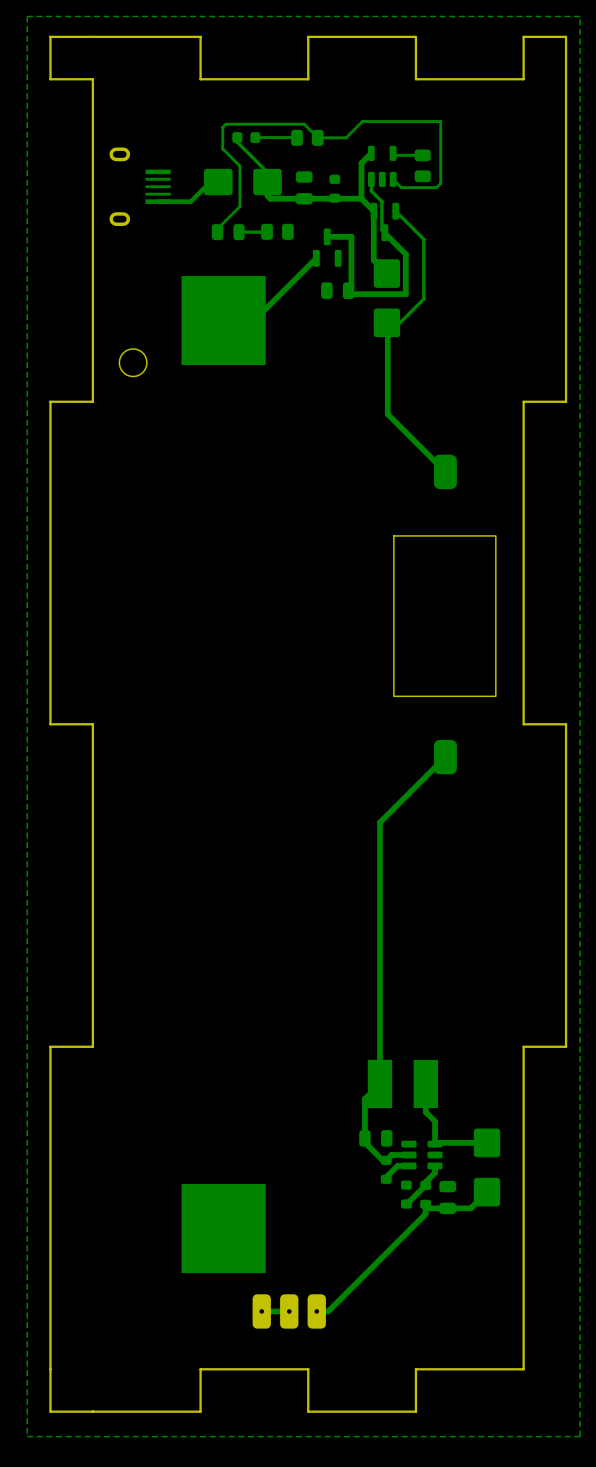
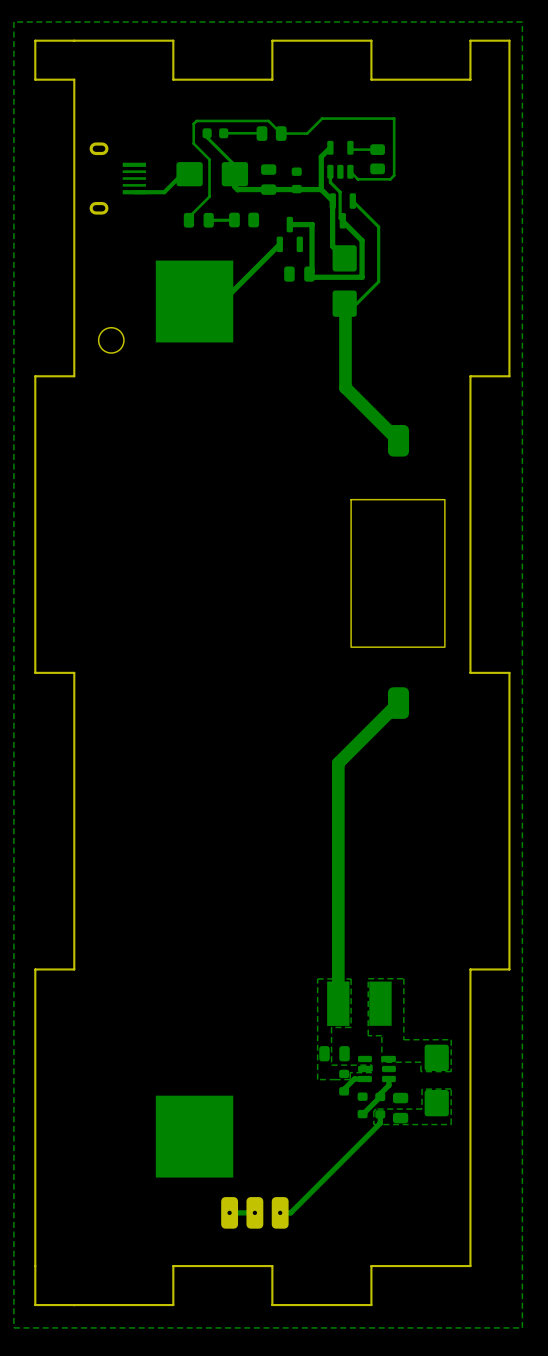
bottom track width: thin (387, 330) (387, 414) (445, 471) -> thick (345, 310) (345, 387) (398, 440)
bottom track width: thin (445, 757) (379, 822) (379, 1083) -> thick (398, 703) (338, 763) (338, 1003)
bottom zone outline: none -> (368, 978) (403, 978) (403, 1039) (451, 1039) (451, 1071) (420, 1071) (420, 1062) (381, 1062) (381, 1035) (368, 1035) (368, 978)
bottom zone outline: none -> (317, 978) (317, 1079) (350, 1079) (350, 1072) (371, 1072) (371, 1065) (331, 1065) (331, 1027) (351, 1027) (351, 978) (317, 978)
bottom track: (379, 1083) (364, 1099) (364, 1142) (382, 1160) (386, 1160) (391, 1155) (408, 1155) -> none
bottom track: (425, 1090) (425, 1112) (435, 1121) (435, 1144) (486, 1142) -> none
bottom zone outline: none -> (451, 1088) (451, 1124) (373, 1124) (373, 1111) (375, 1109) (422, 1109) (422, 1089) (451, 1088)
bottom track: (486, 1192) (470, 1208) (429, 1208) (425, 1204) -> none

